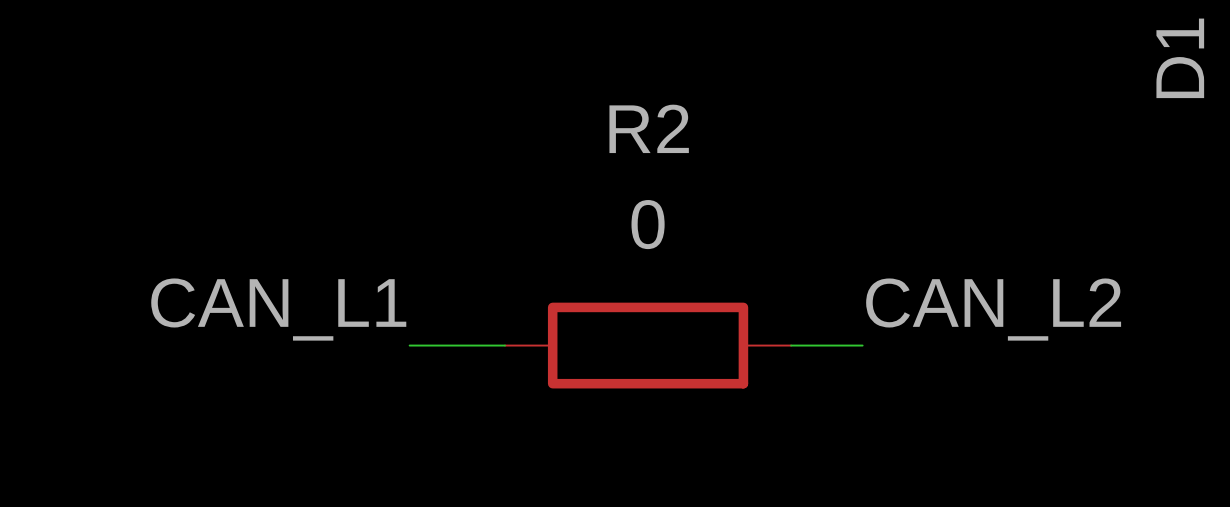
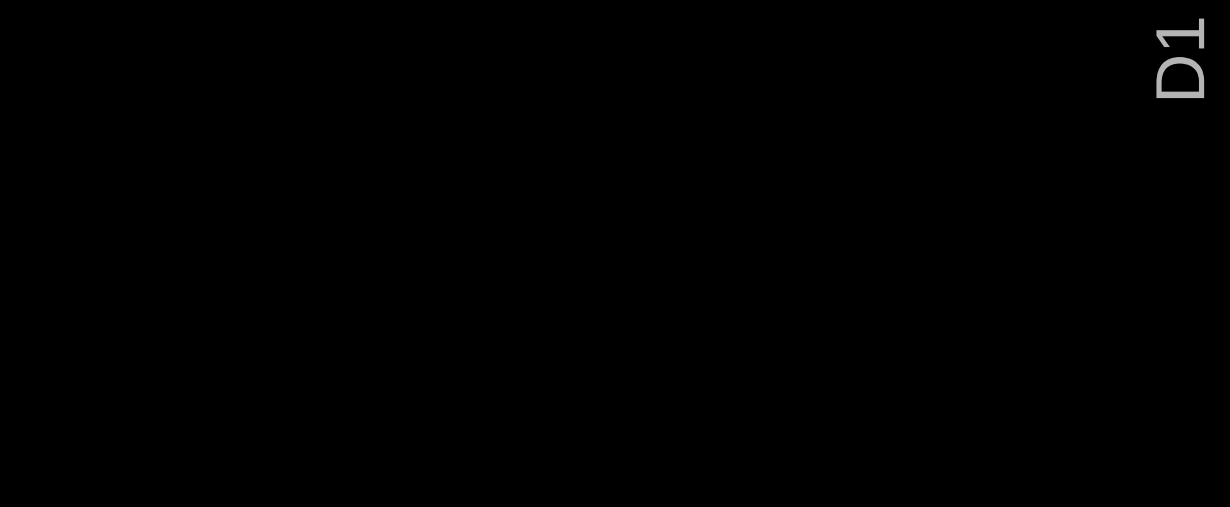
label: CAN_L1 (278, 309) -> none
label: CAN_L2 (993, 309) -> none
wire: (409, 345) (505, 345) -> none
R2: 0 (648, 345) -> none
wire: (791, 345) (862, 345) -> none

